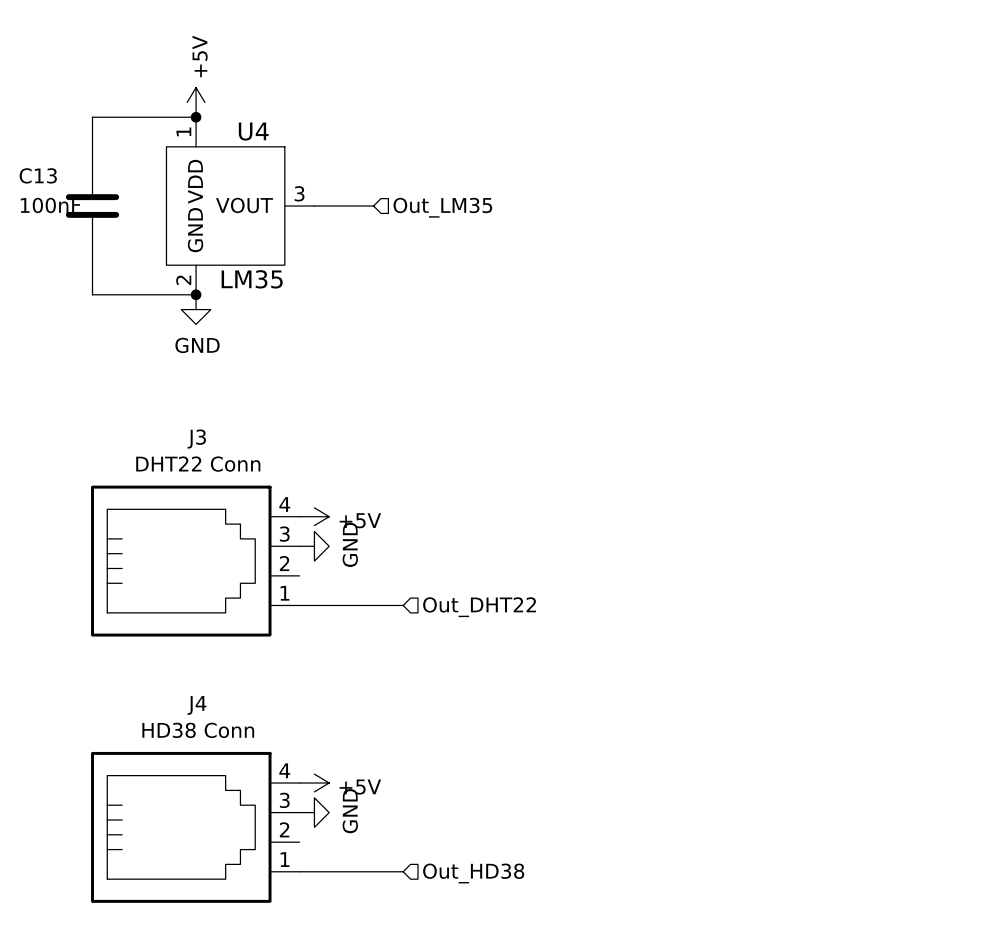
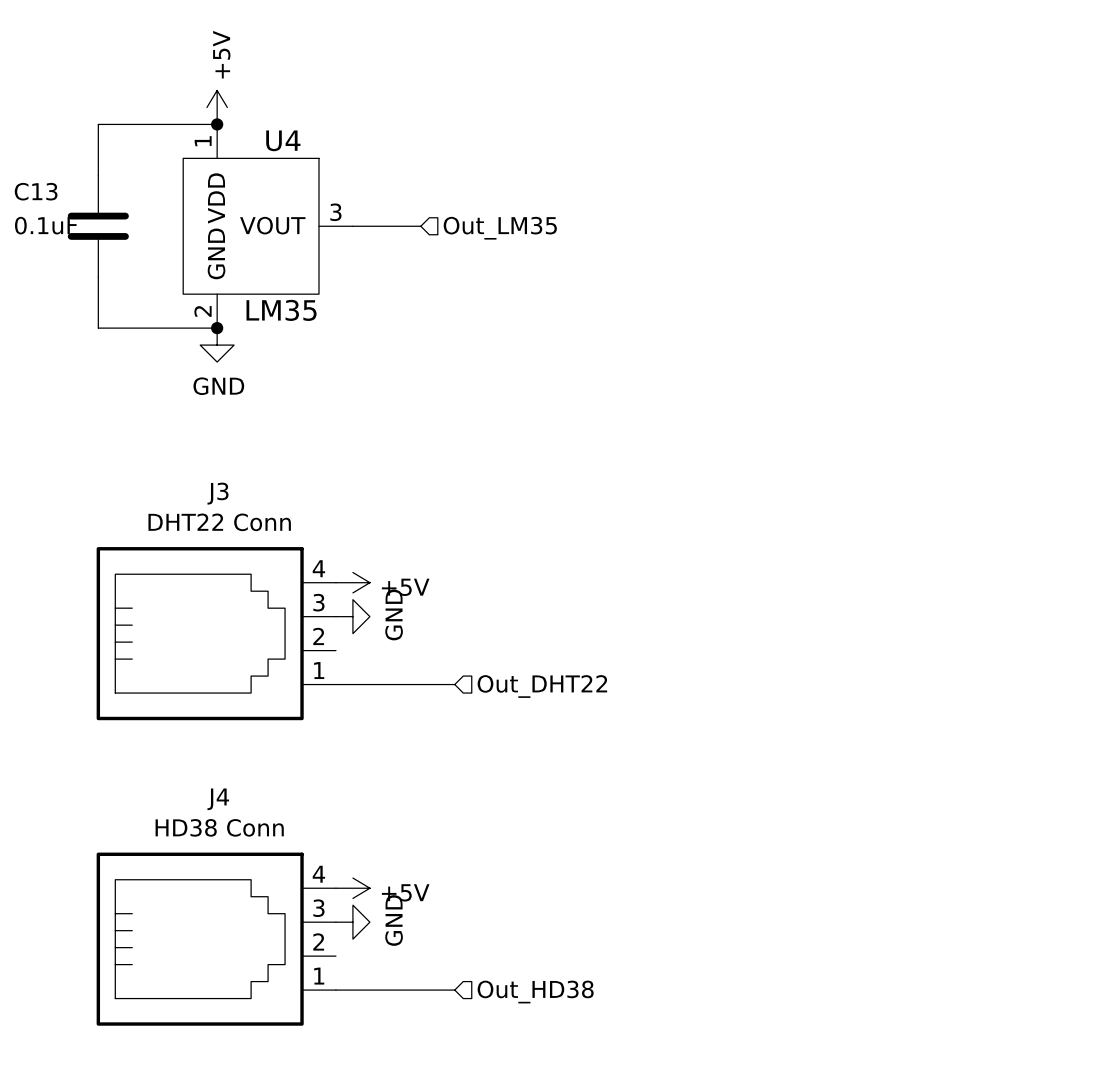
C13 value: 100nF (50, 205) -> 0.1uF (46, 225)

